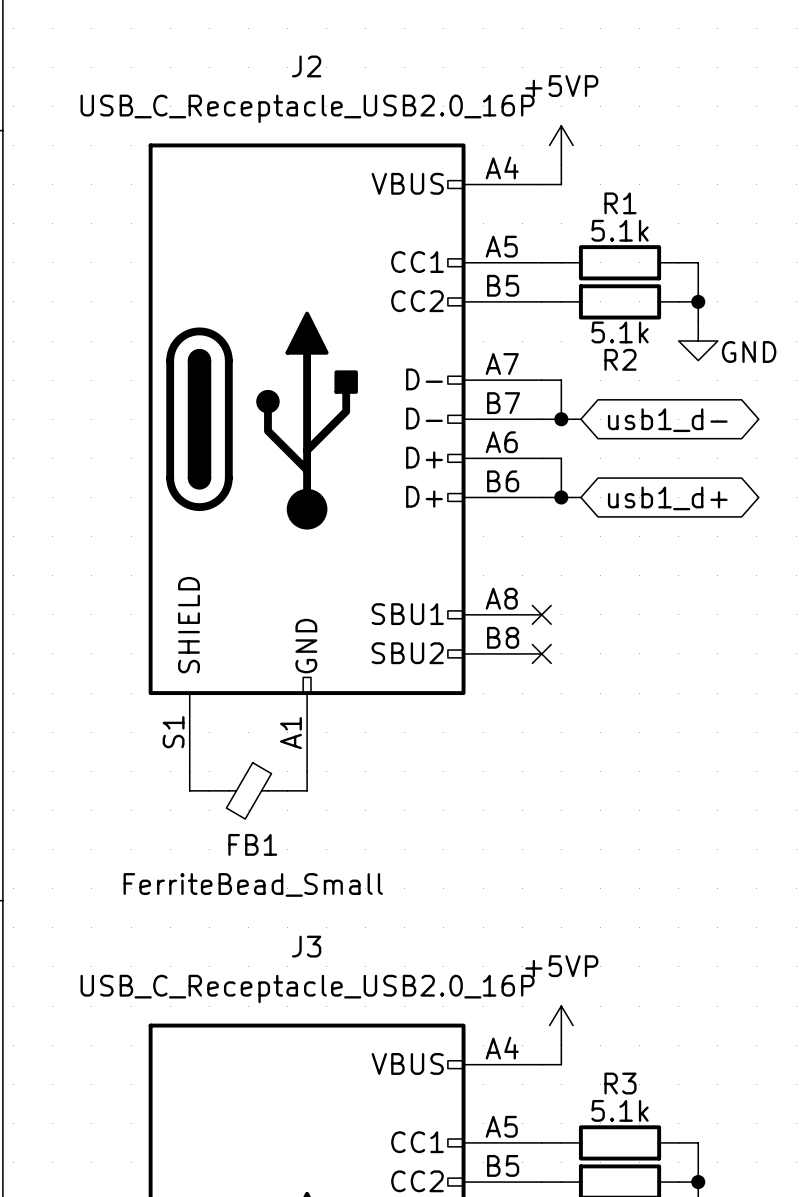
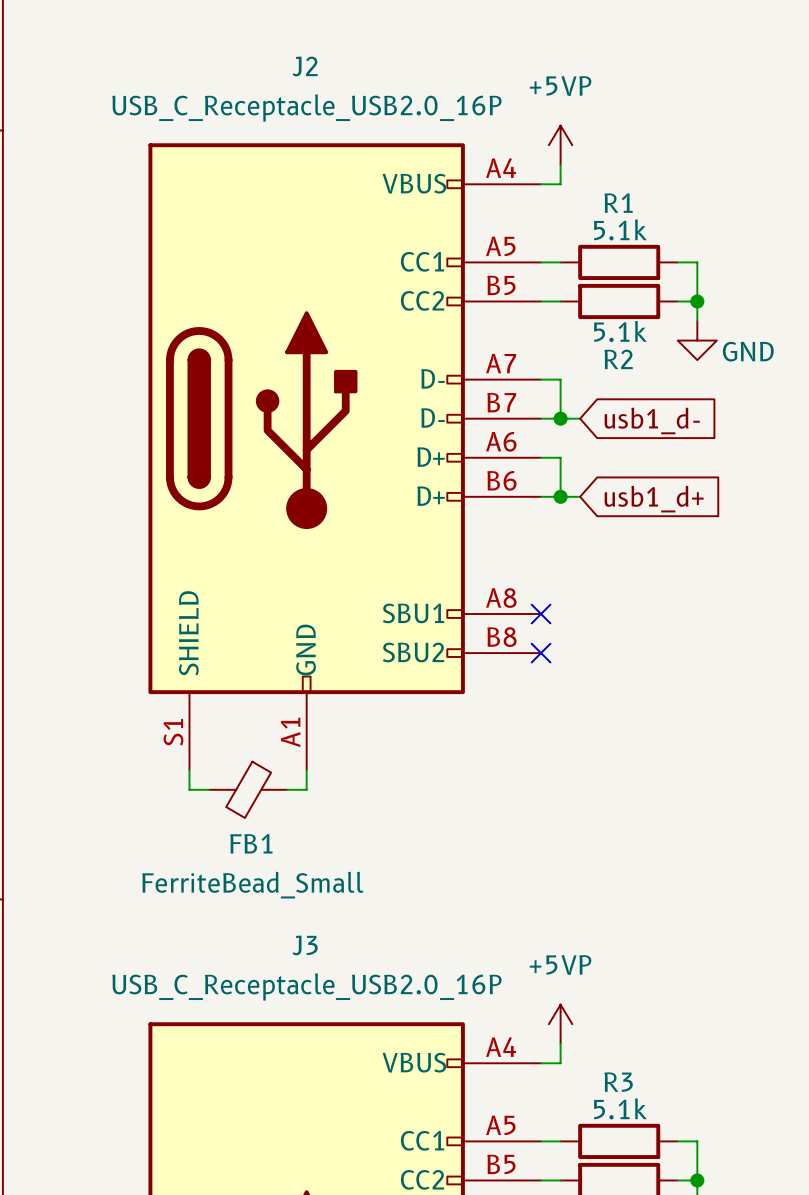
global label shape: bidirectional (667, 420) -> input (652, 420)
global label shape: bidirectional (667, 498) -> input (654, 499)

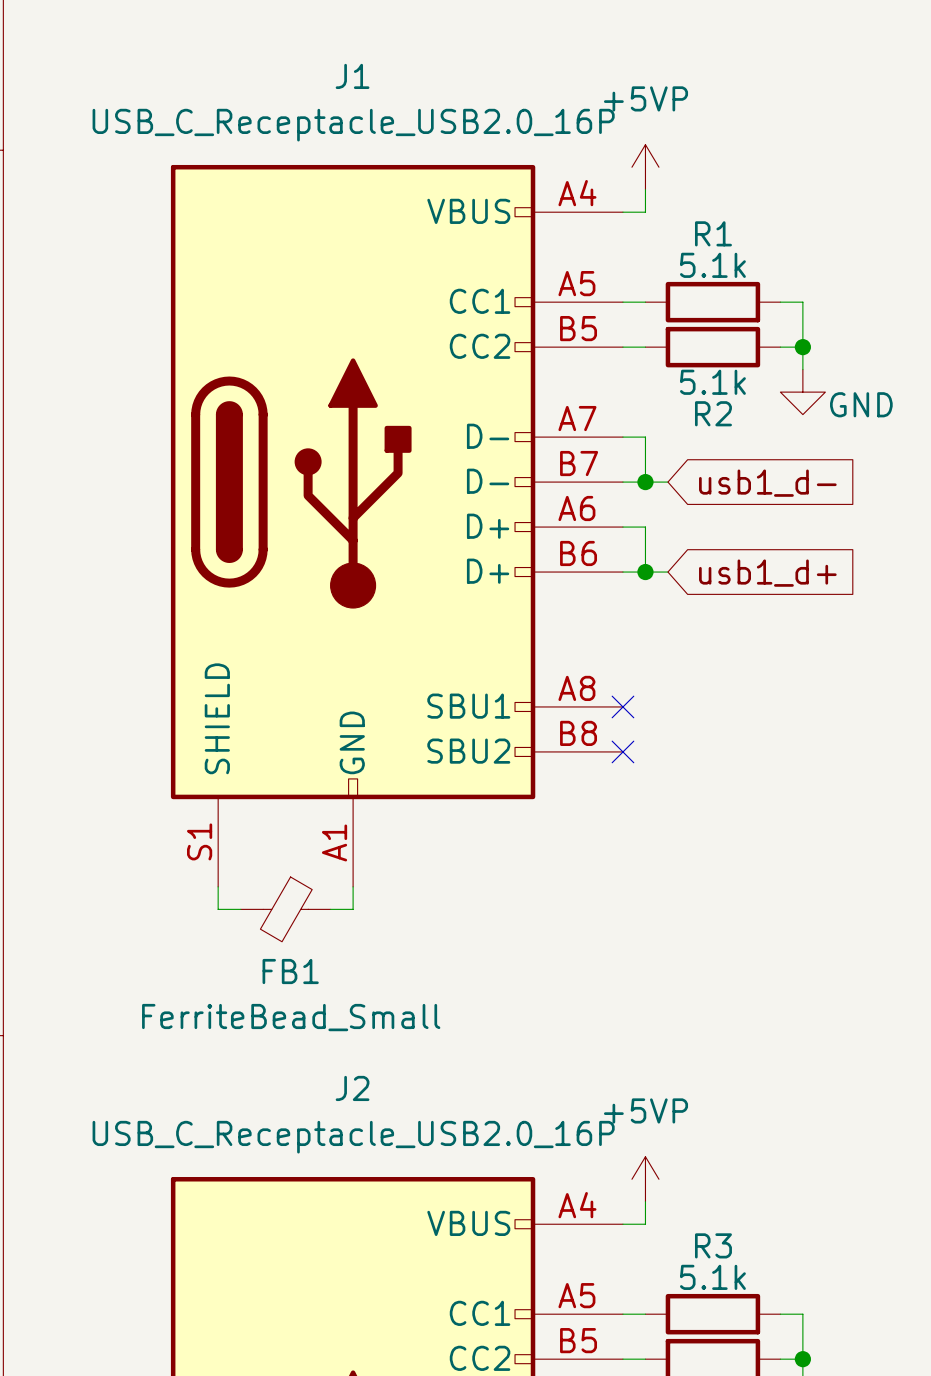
J2 name: J2 (305, 66) -> J1 (352, 76)
J3 name: J3 (305, 945) -> J2 (352, 1088)

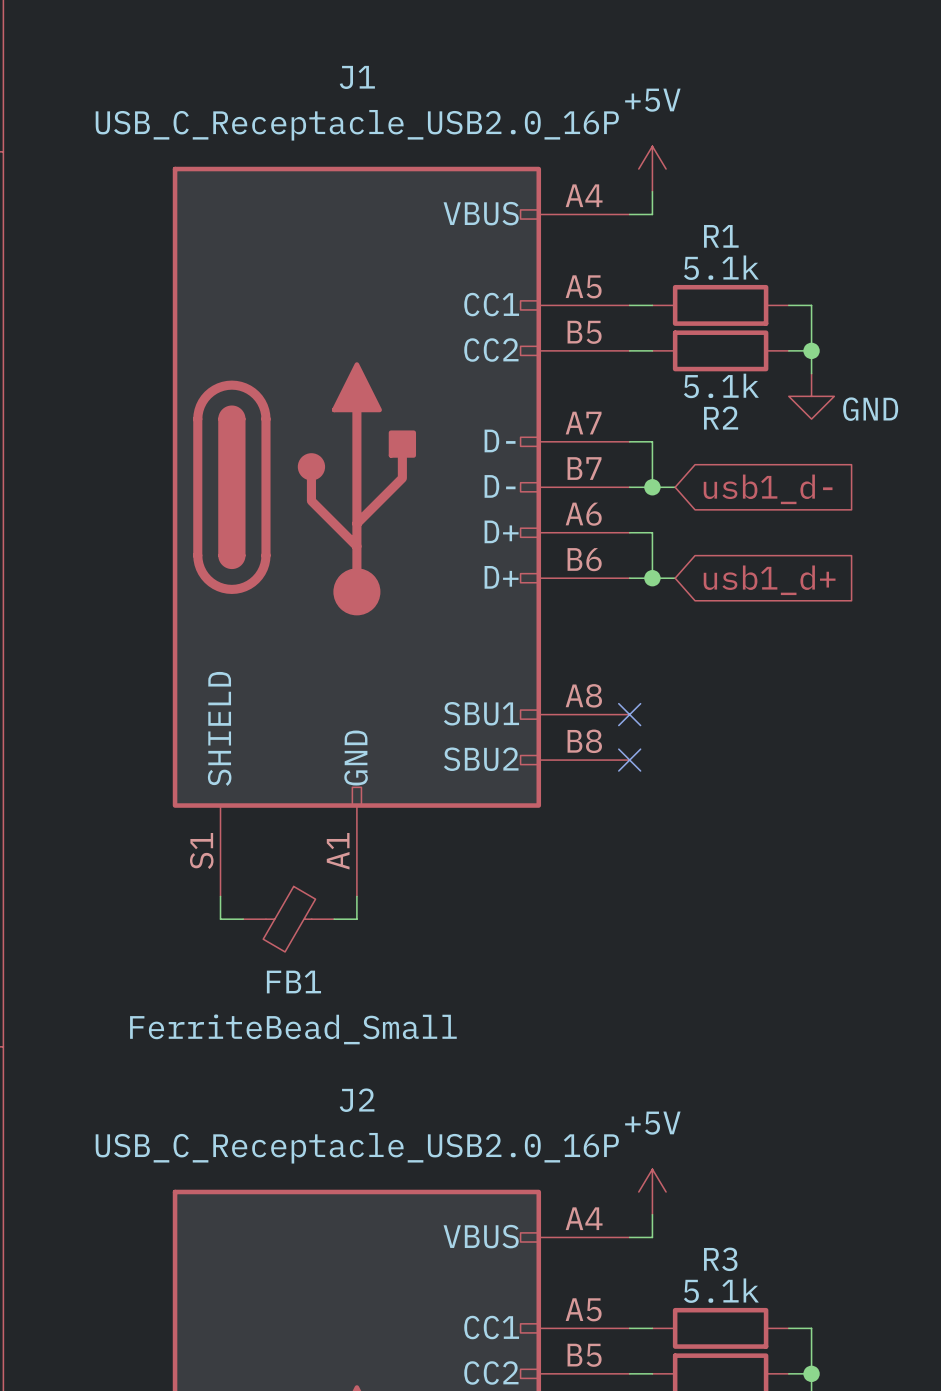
power symbol: +5VP (645, 167) -> +5V (652, 169)
power symbol: +5VP (645, 1179) -> +5V (652, 1191)

